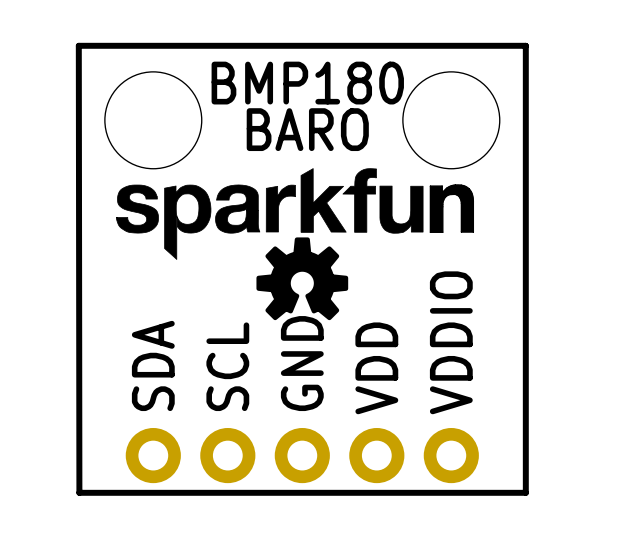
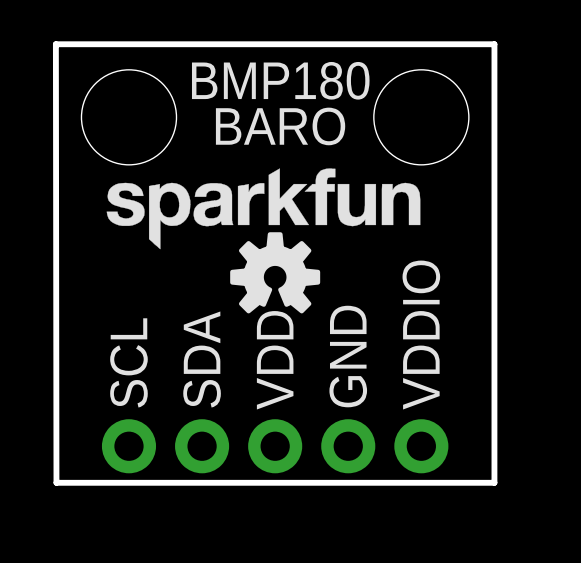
drawing shape: [116, 168, 474, 260] -> [106, 168, 421, 250]
text: GND (302, 363) -> VDD (275, 360)
text: SDA (153, 365) -> SCL (128, 362)
text: SCL (227, 366) -> SDA (202, 359)
text: VDD (376, 368) -> GND (348, 356)

